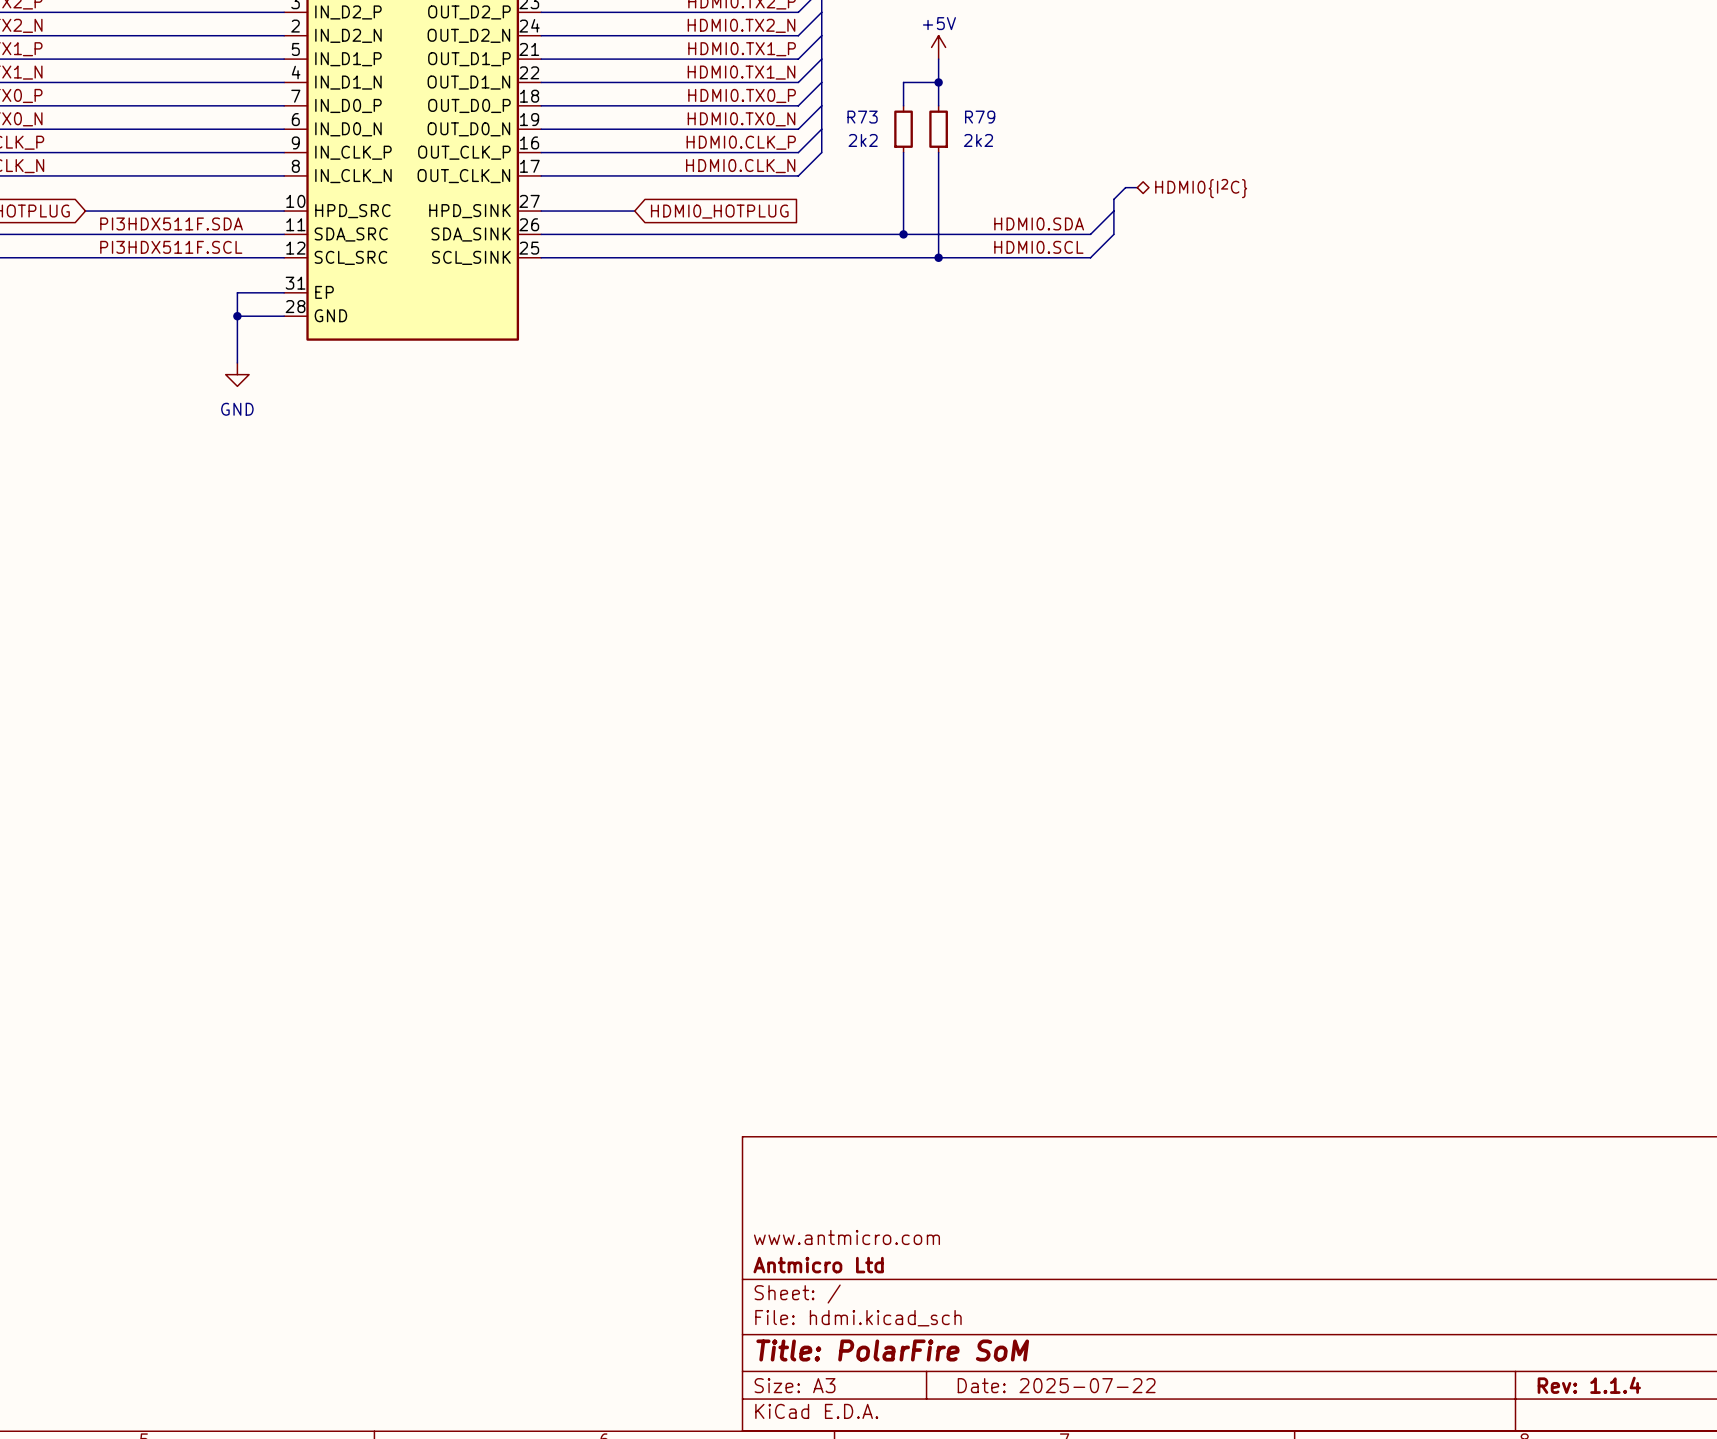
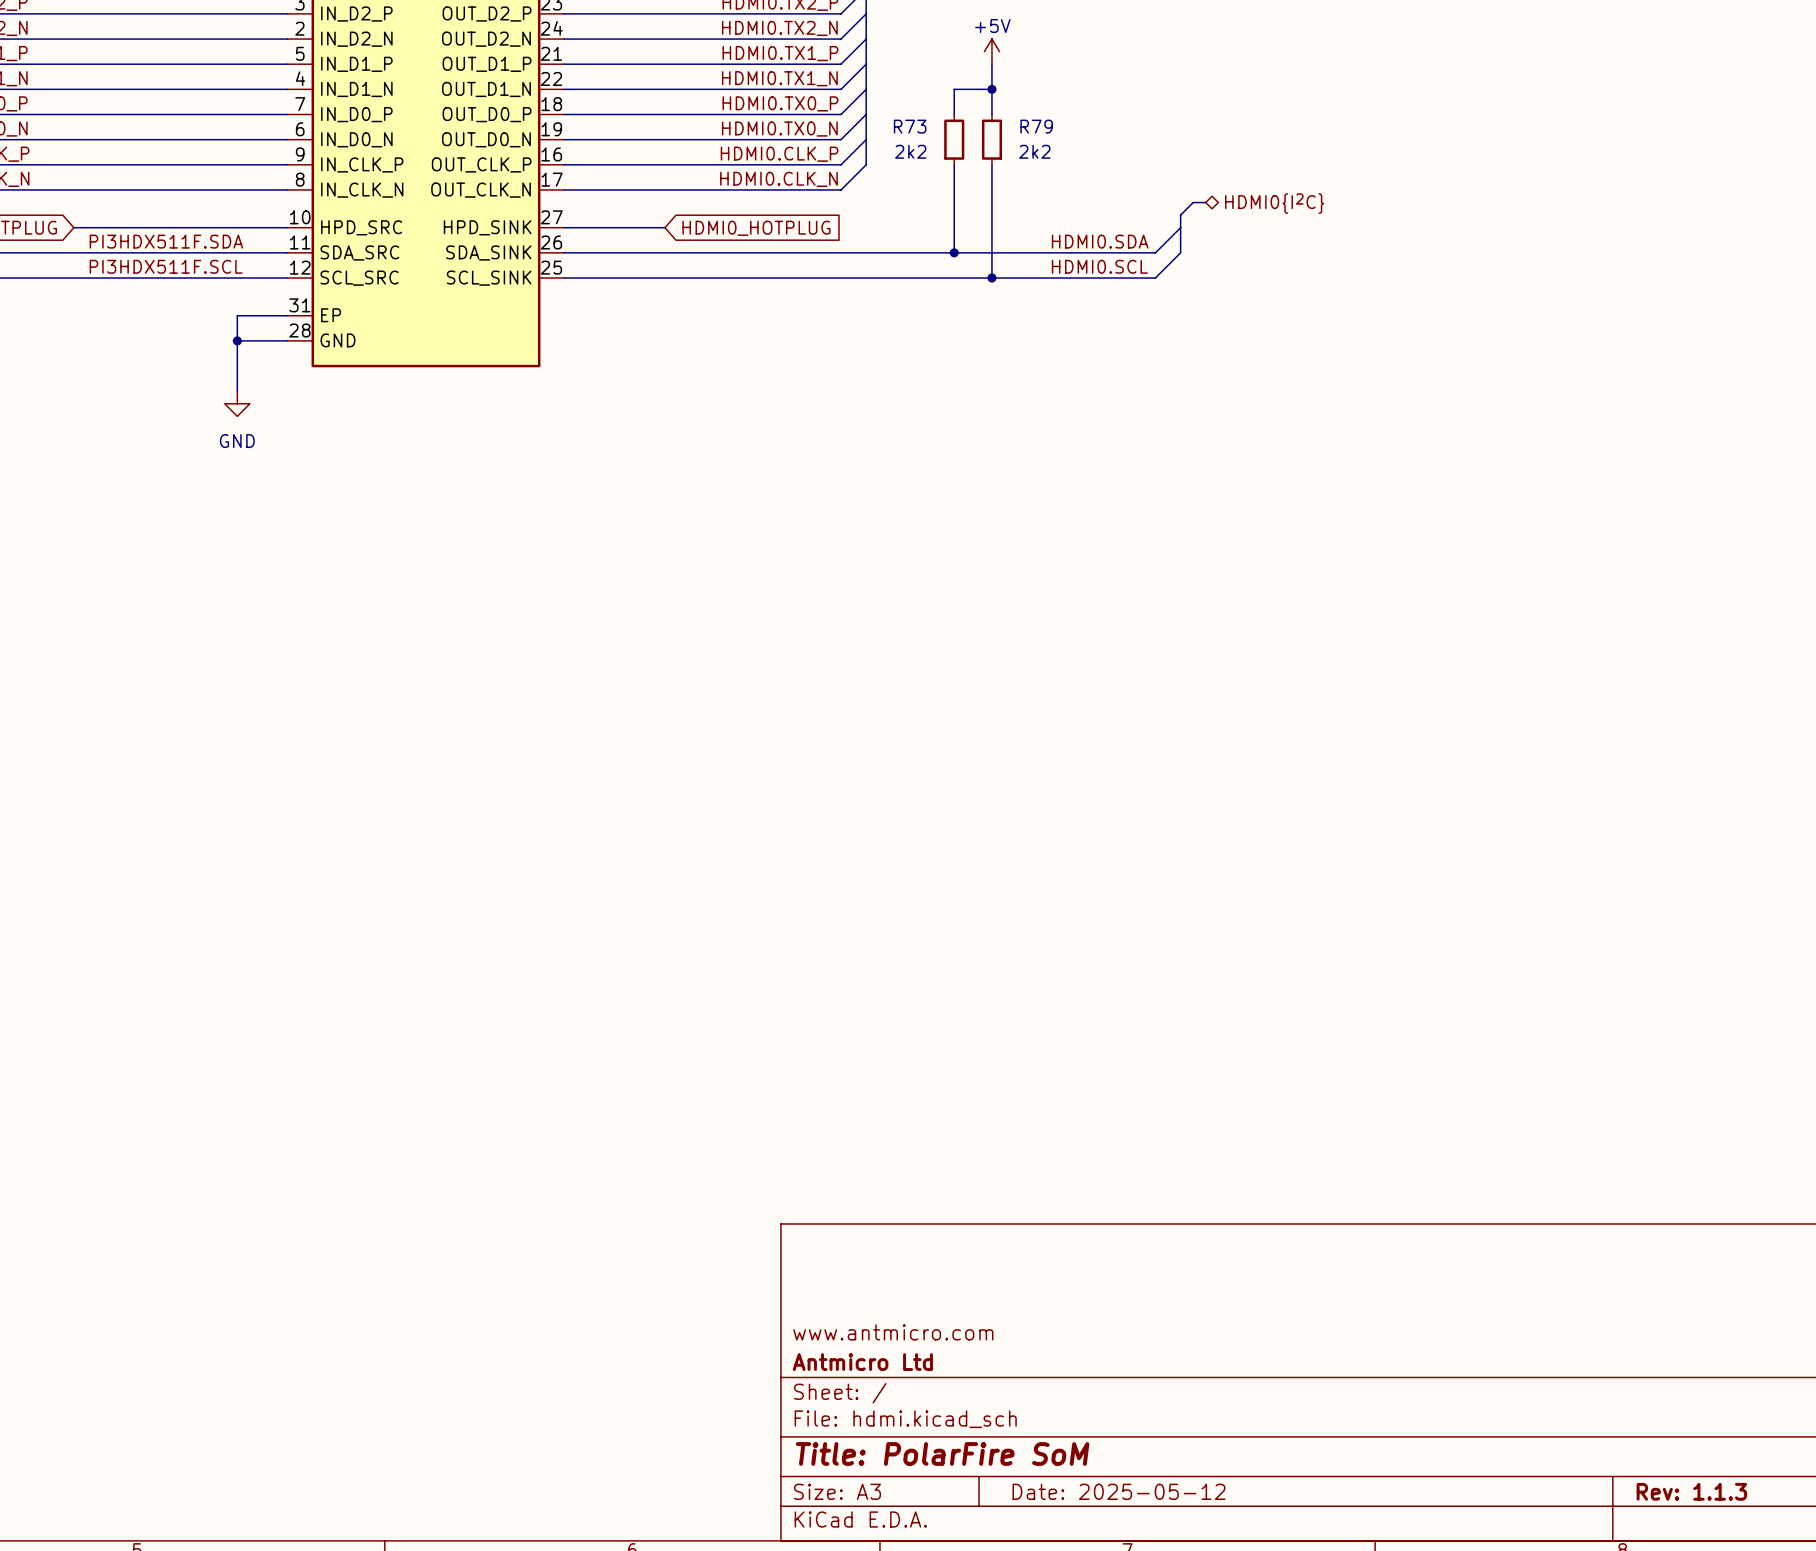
title block: Date: 2025-07-22 (1056, 1385) -> Date: 2025-05-12 (1118, 1491)
title block: Rev: 1.1.4 (1589, 1385) -> Rev: 1.1.3 (1691, 1491)

